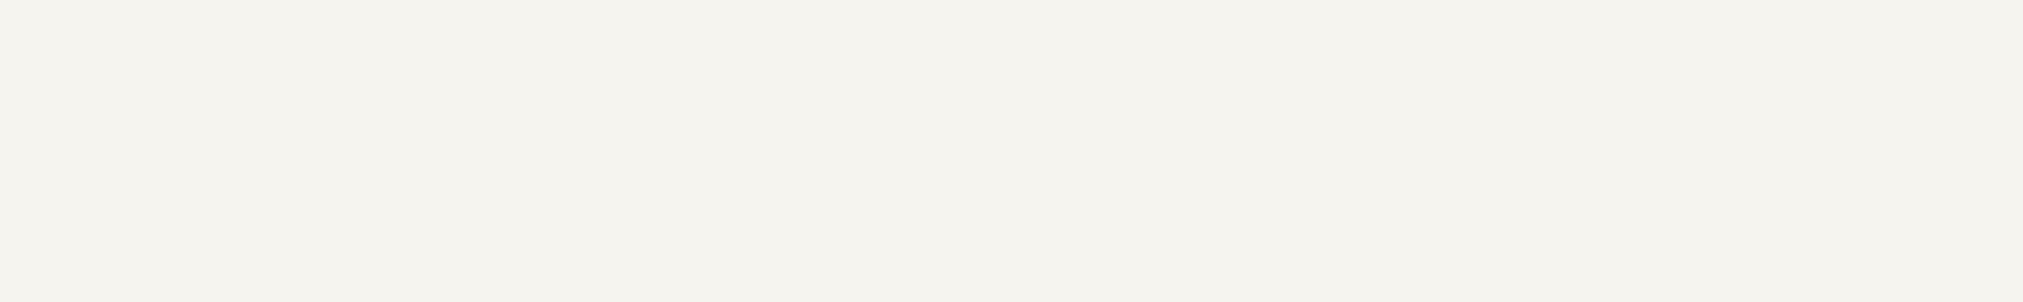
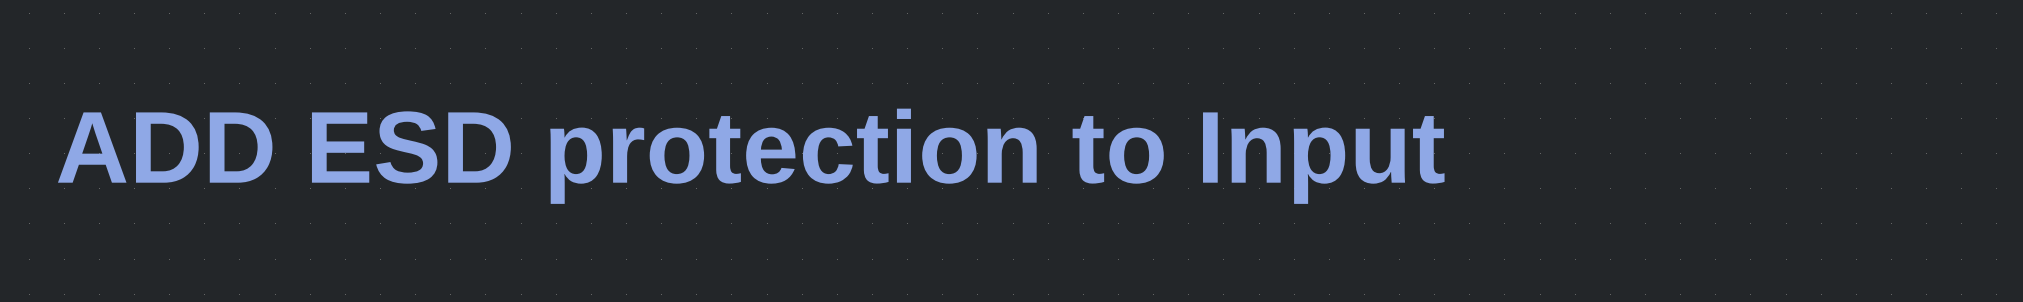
text: none -> ADD ESD protection to Input (751, 156)

